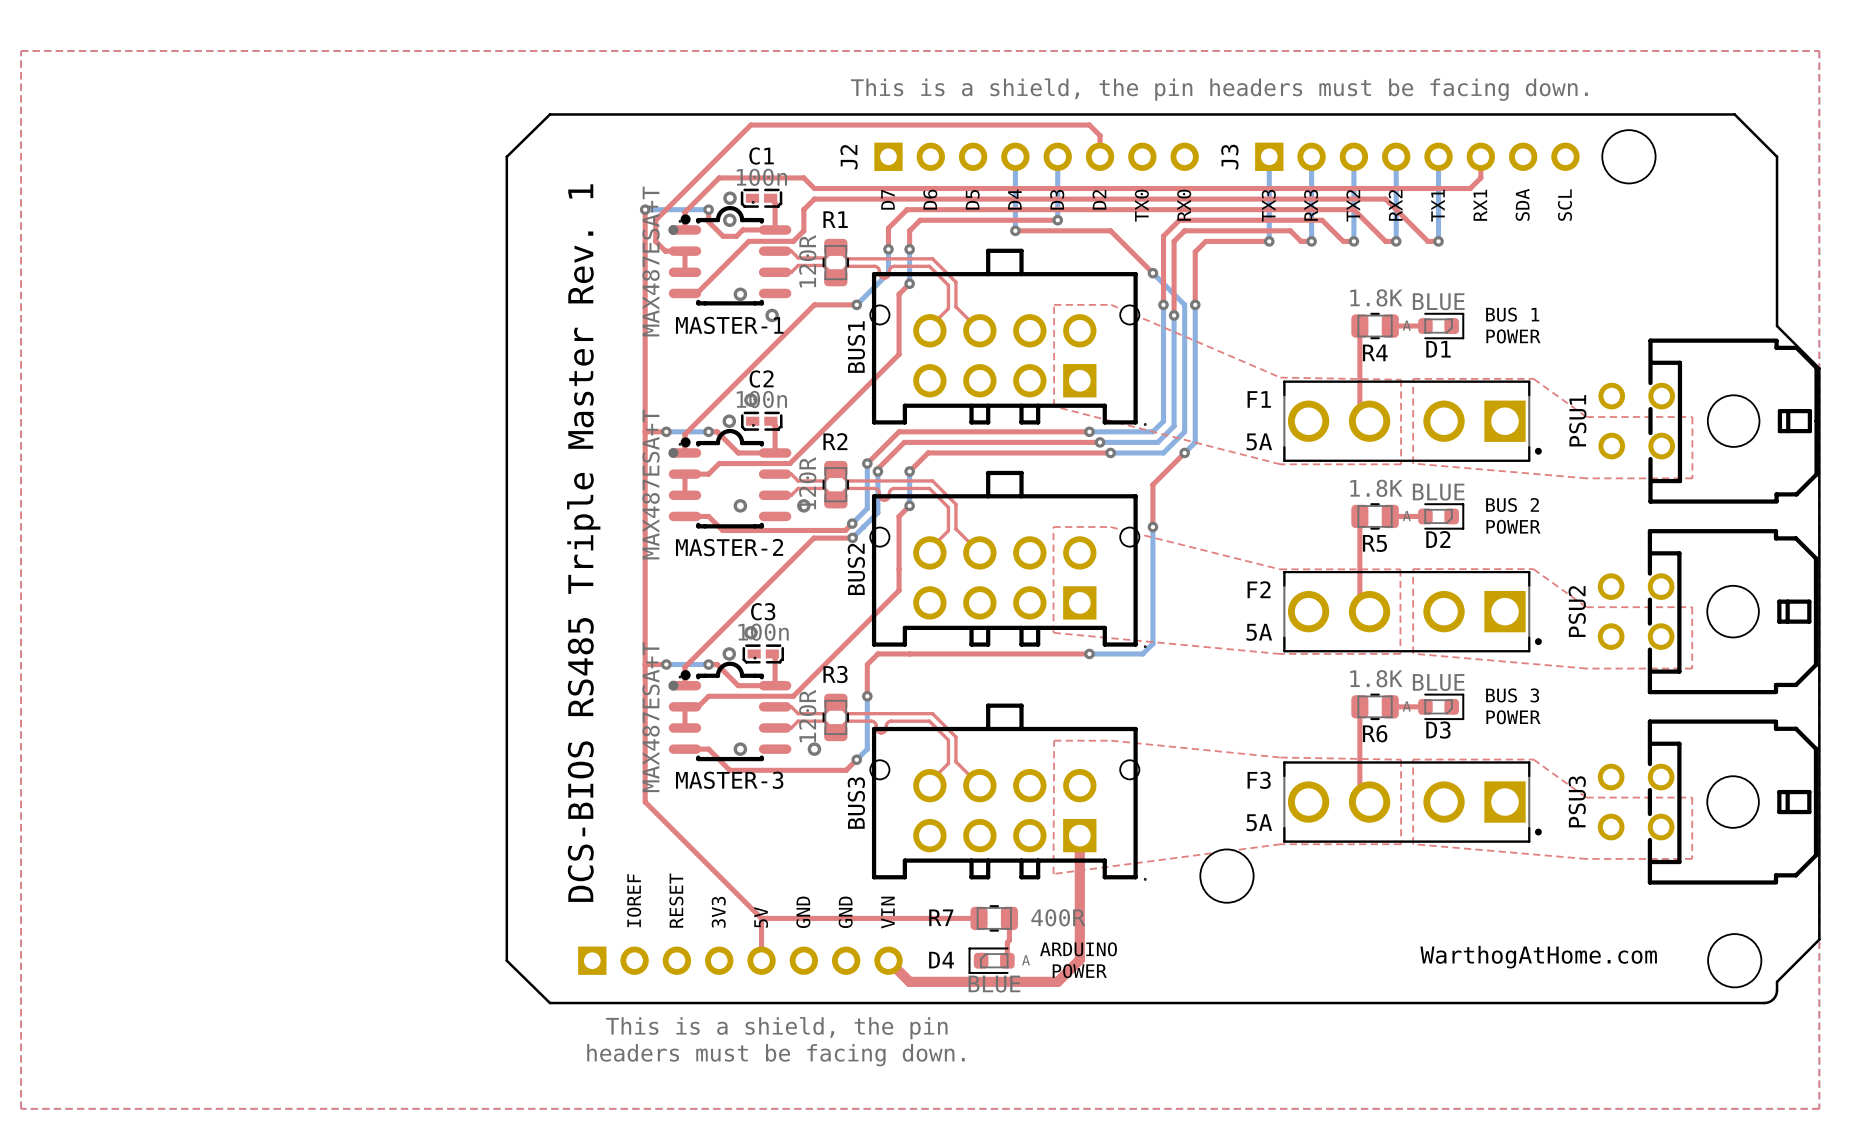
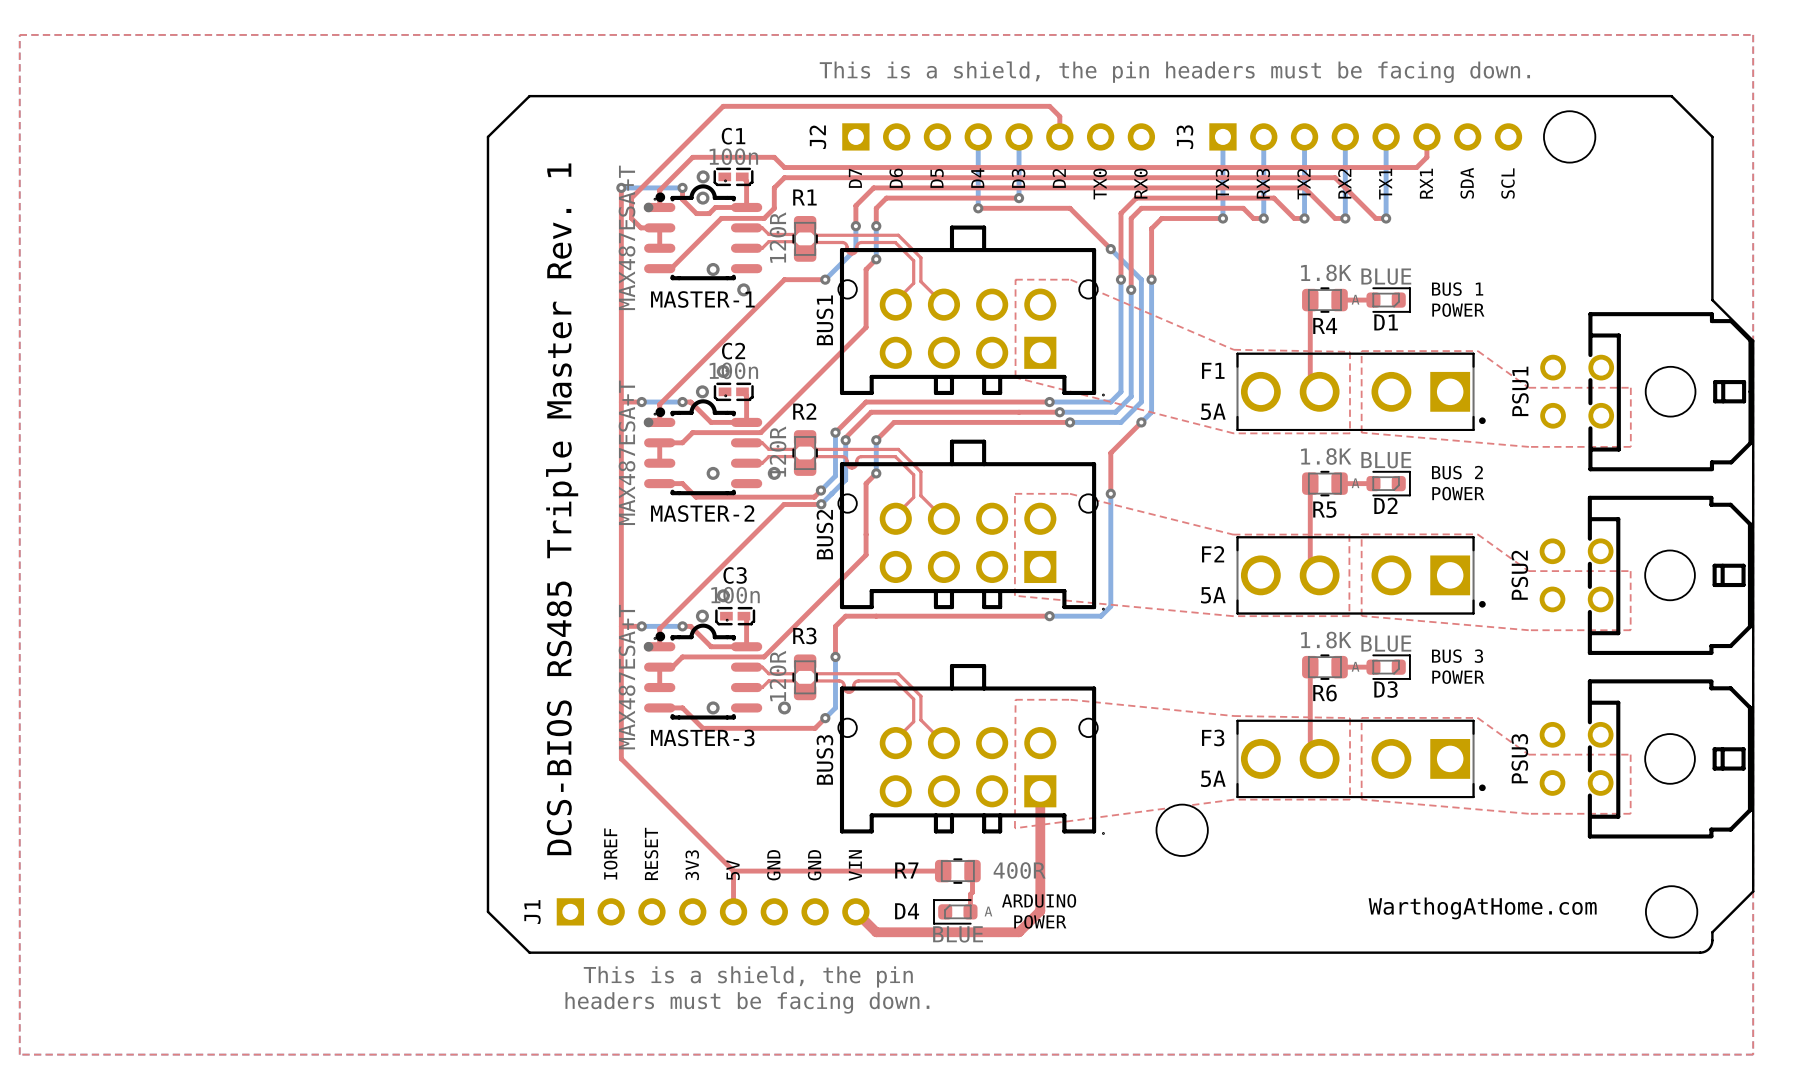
J1 name: none -> J1 (532, 912)

